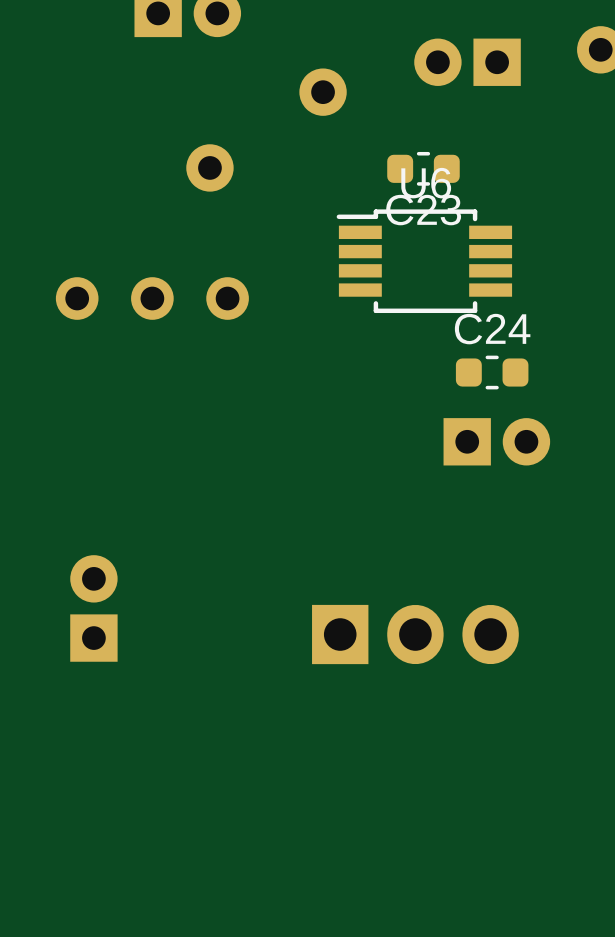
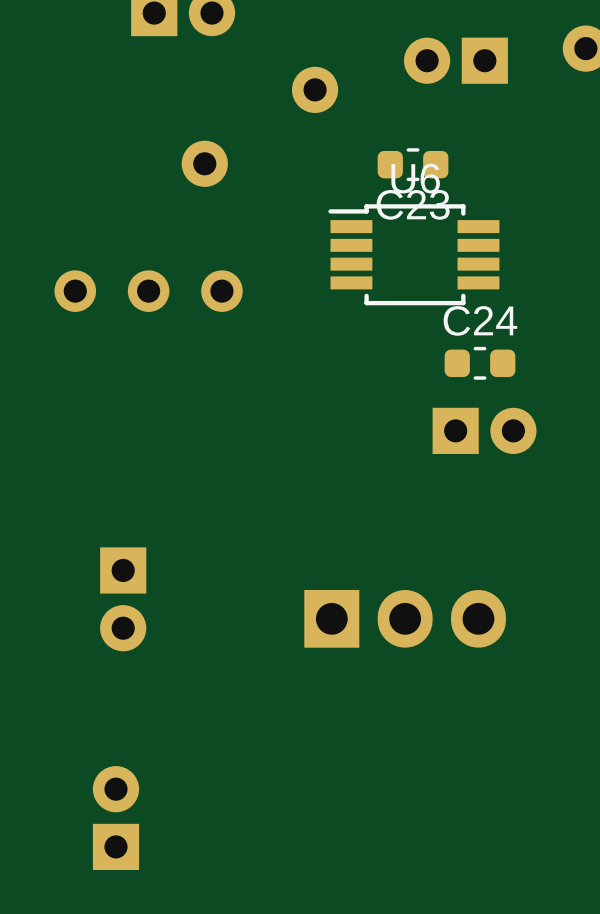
part rotation: 0° (93, 608) -> 180° (123, 599)
part: none -> (115, 818)

